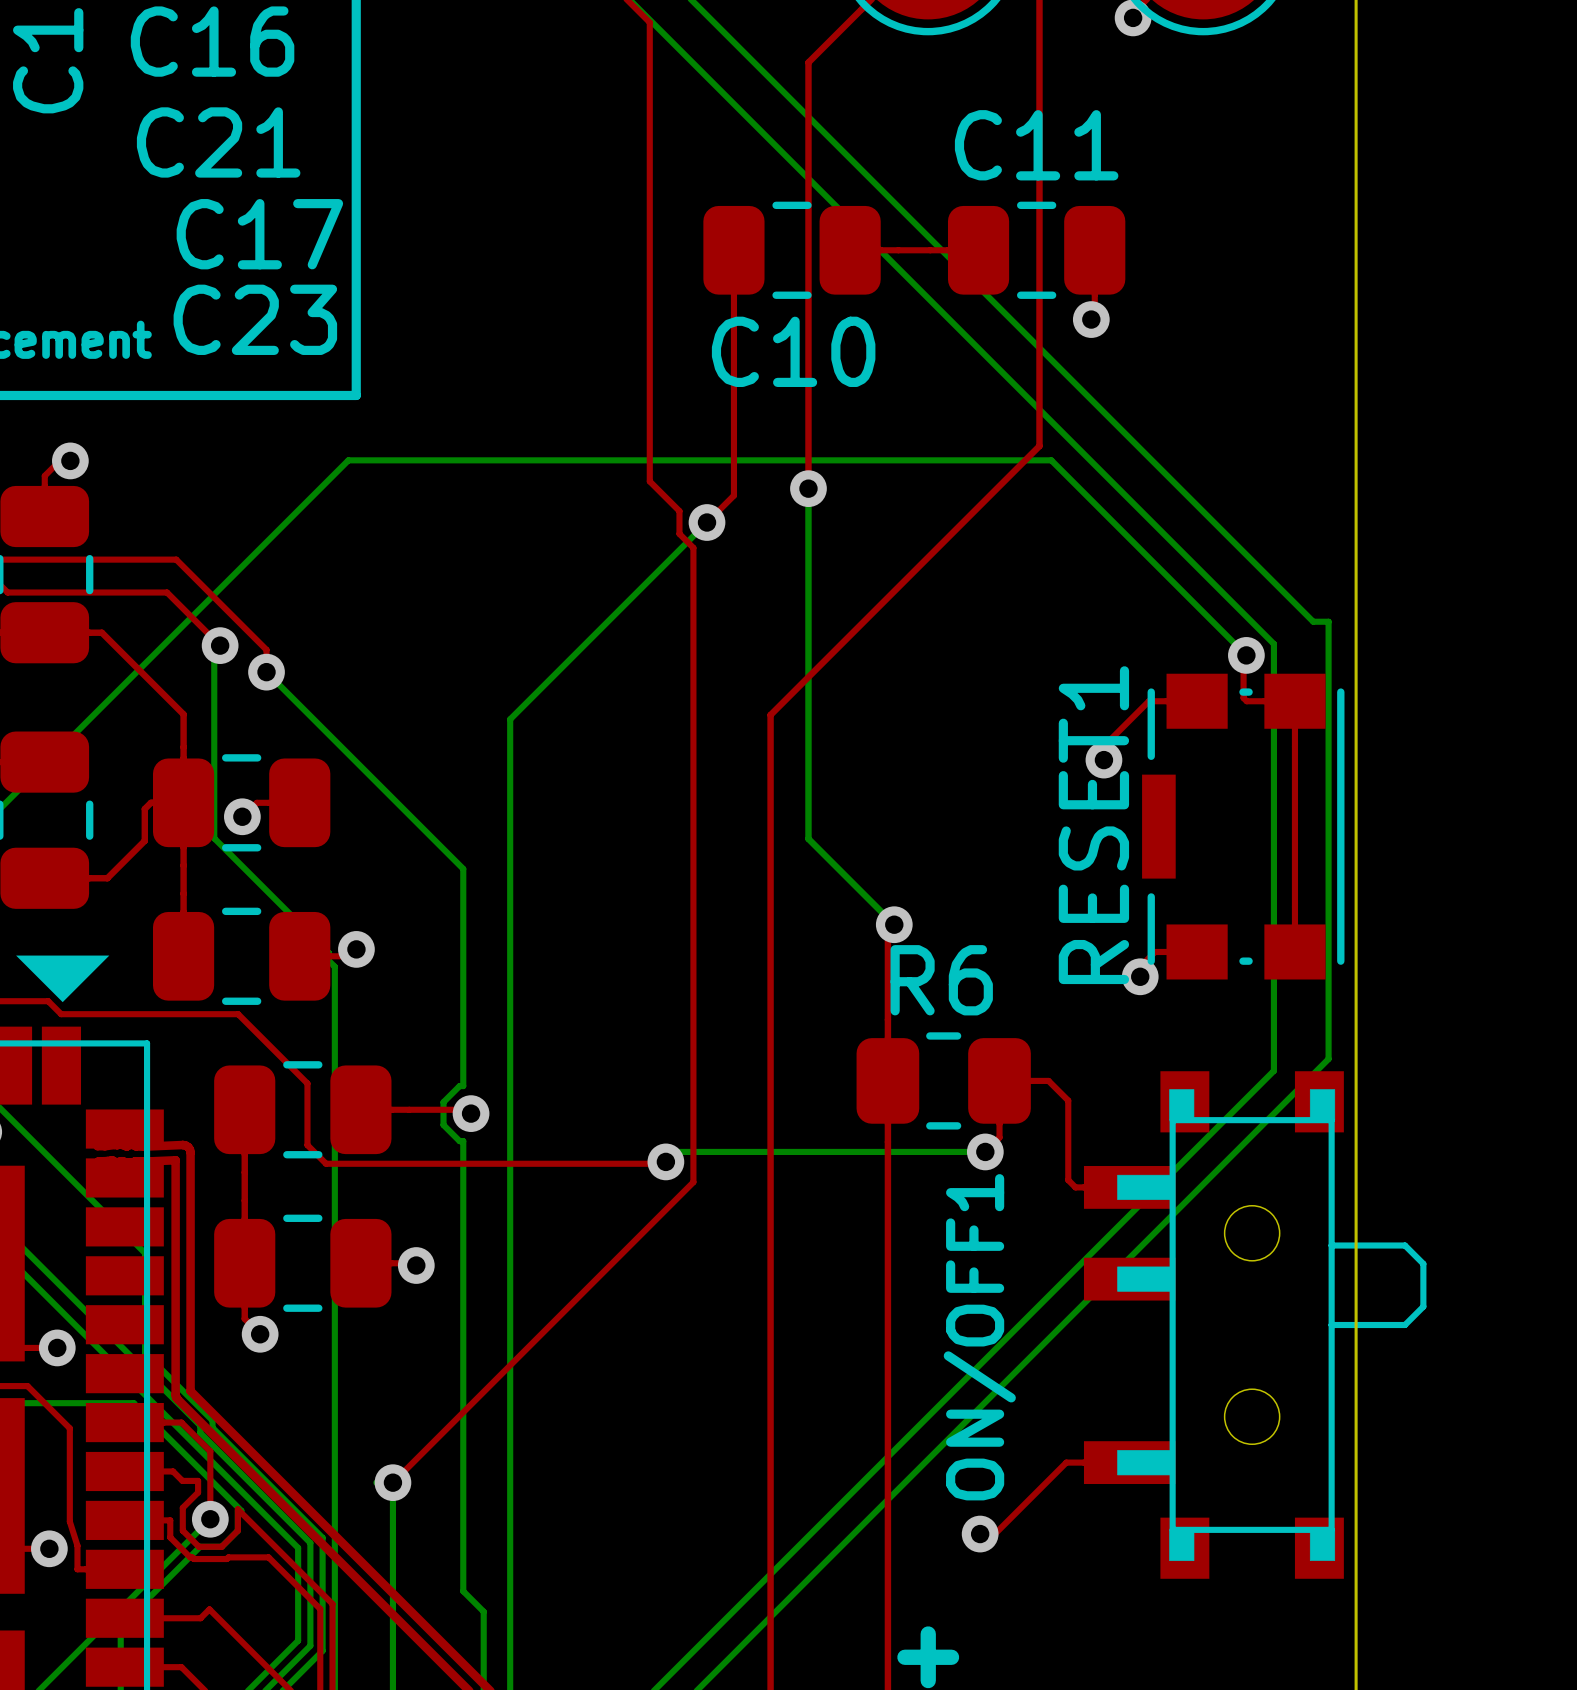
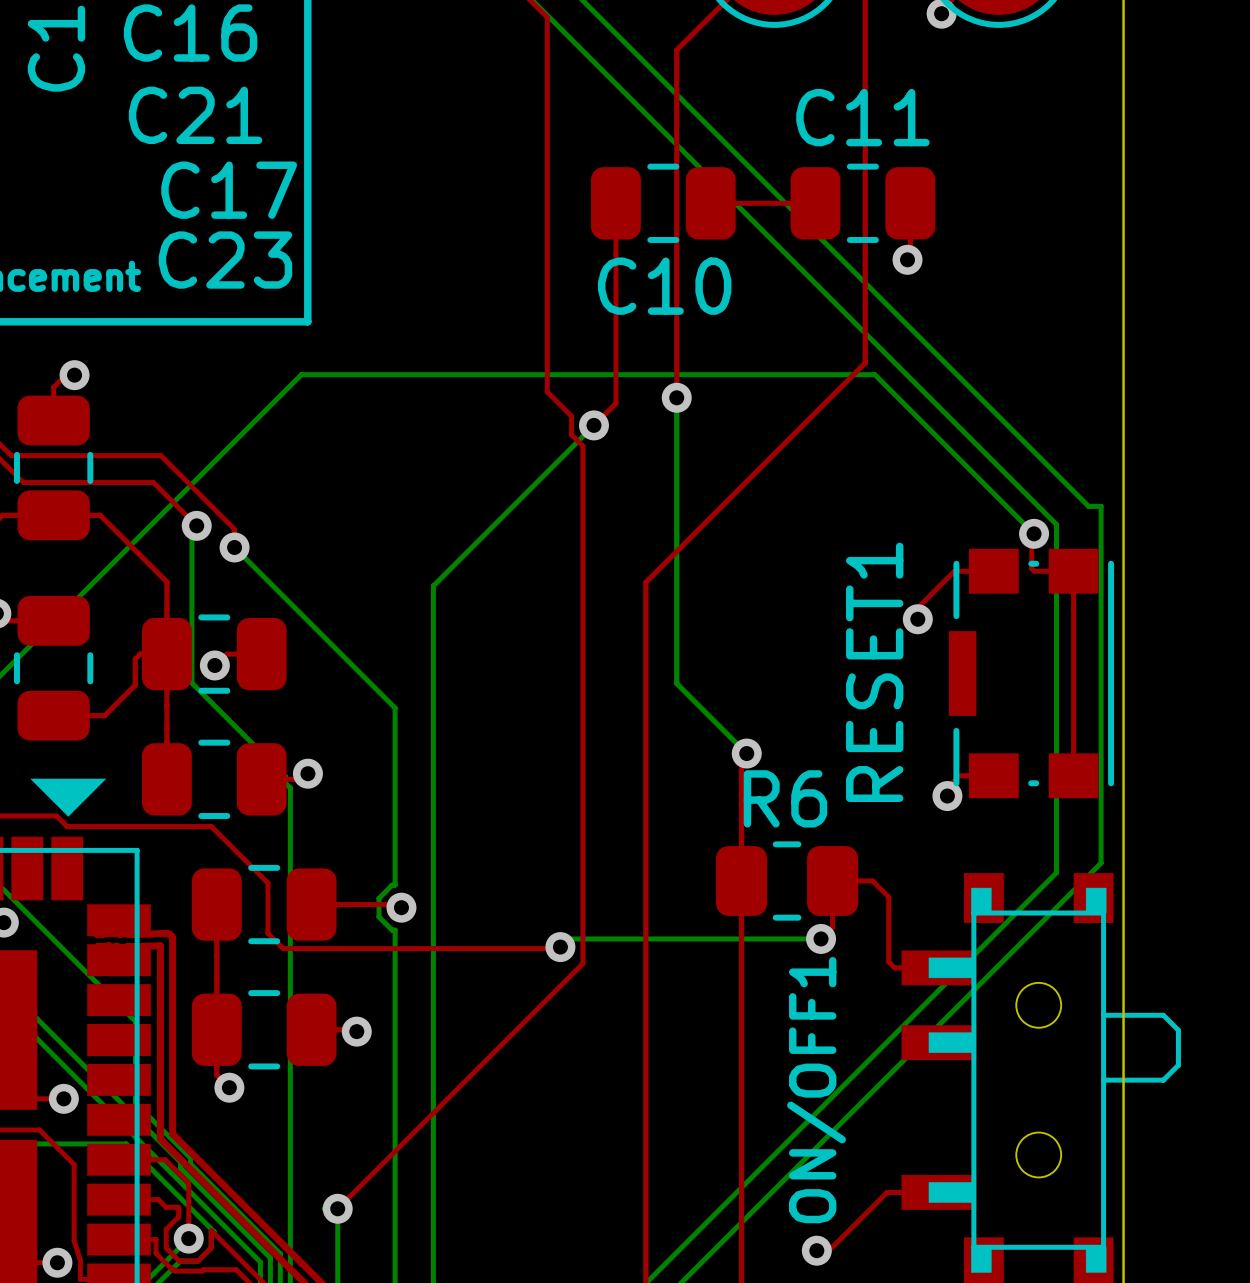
RESET1 name position: RESET1 (1093, 825) -> RESET1 (874, 672)

